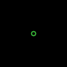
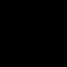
via: (33, 33) -> none

